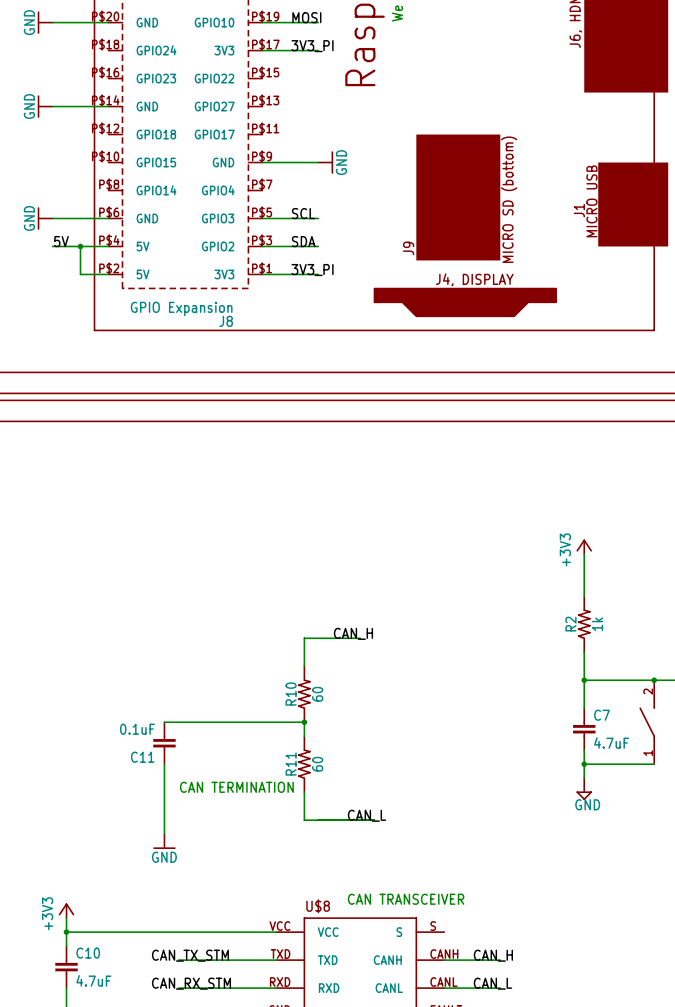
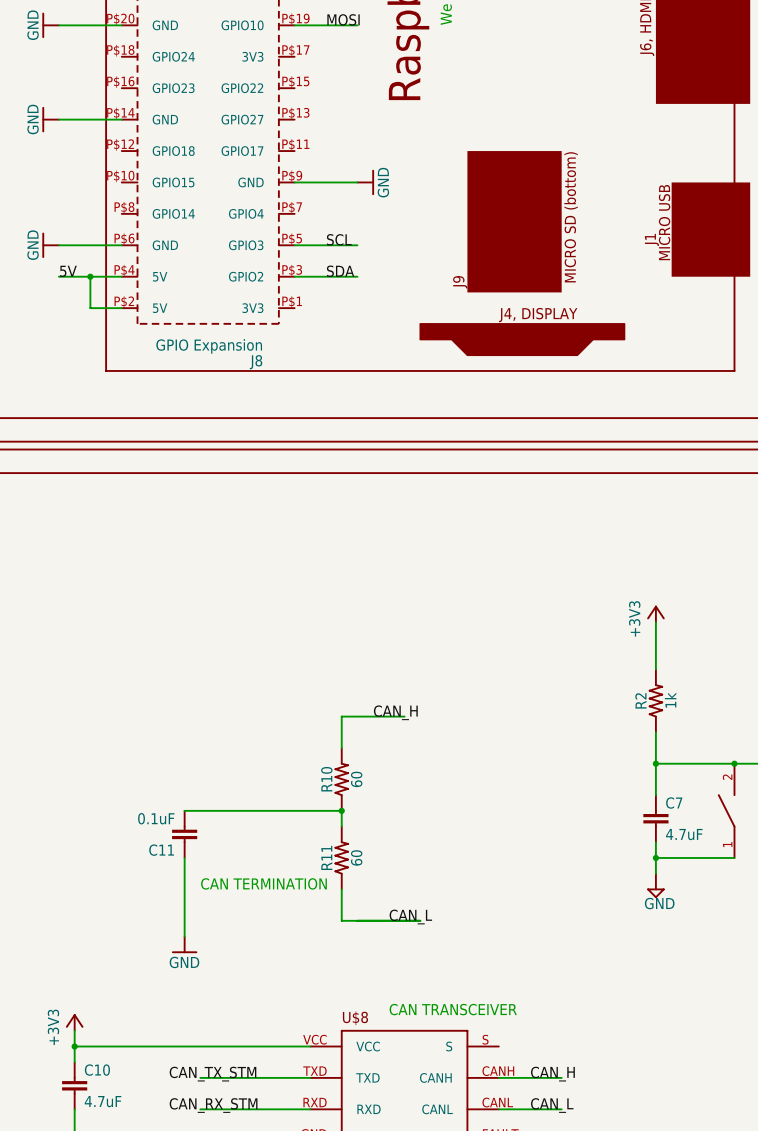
label: 3V3_PI (312, 46) -> none
wire: (262, 50) (318, 50) -> none
label: 3V3_PI (312, 270) -> none
wire: (262, 274) (318, 274) -> none

